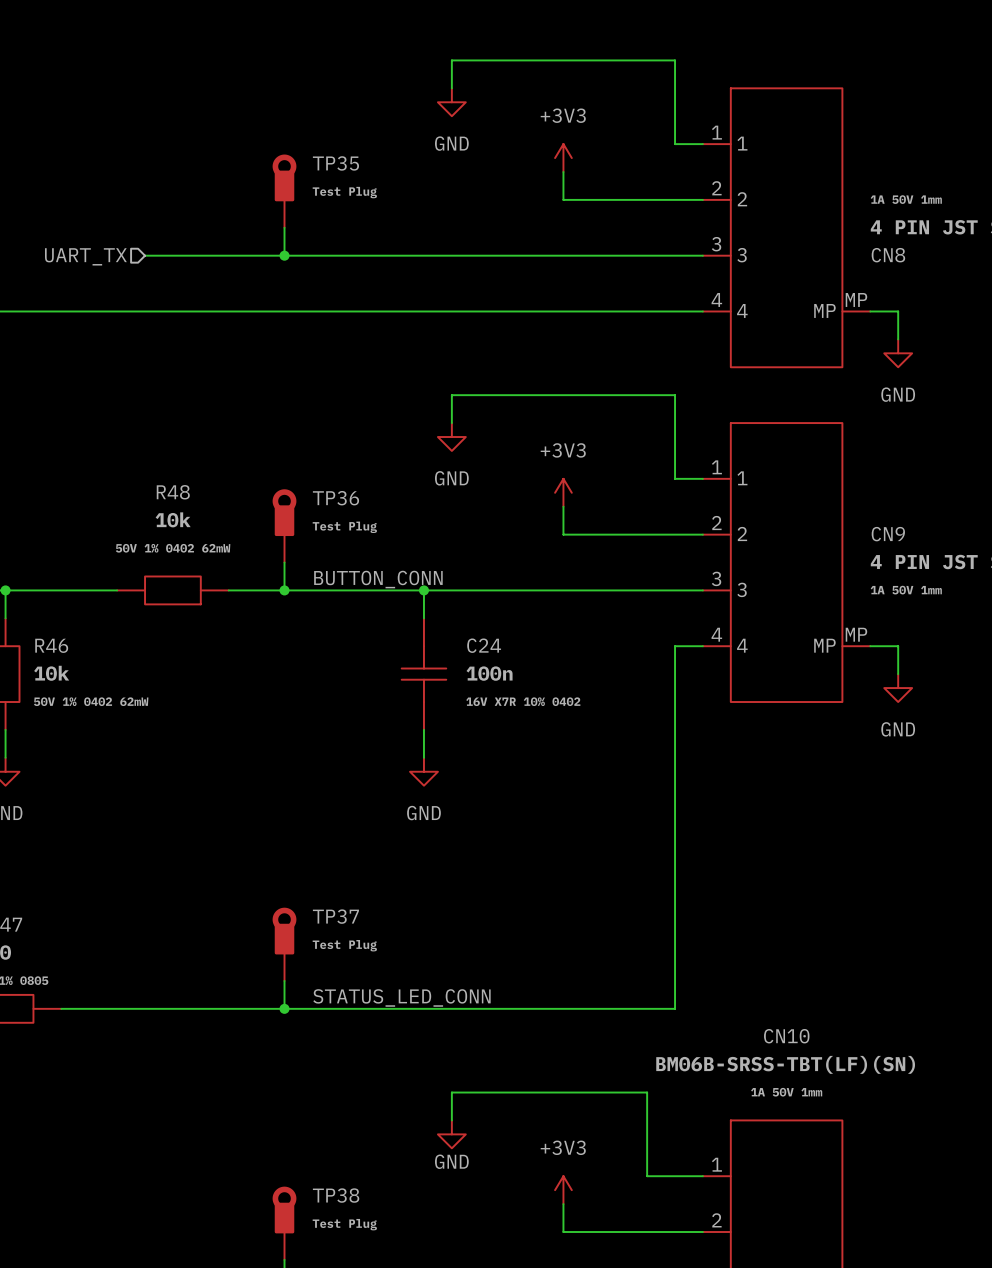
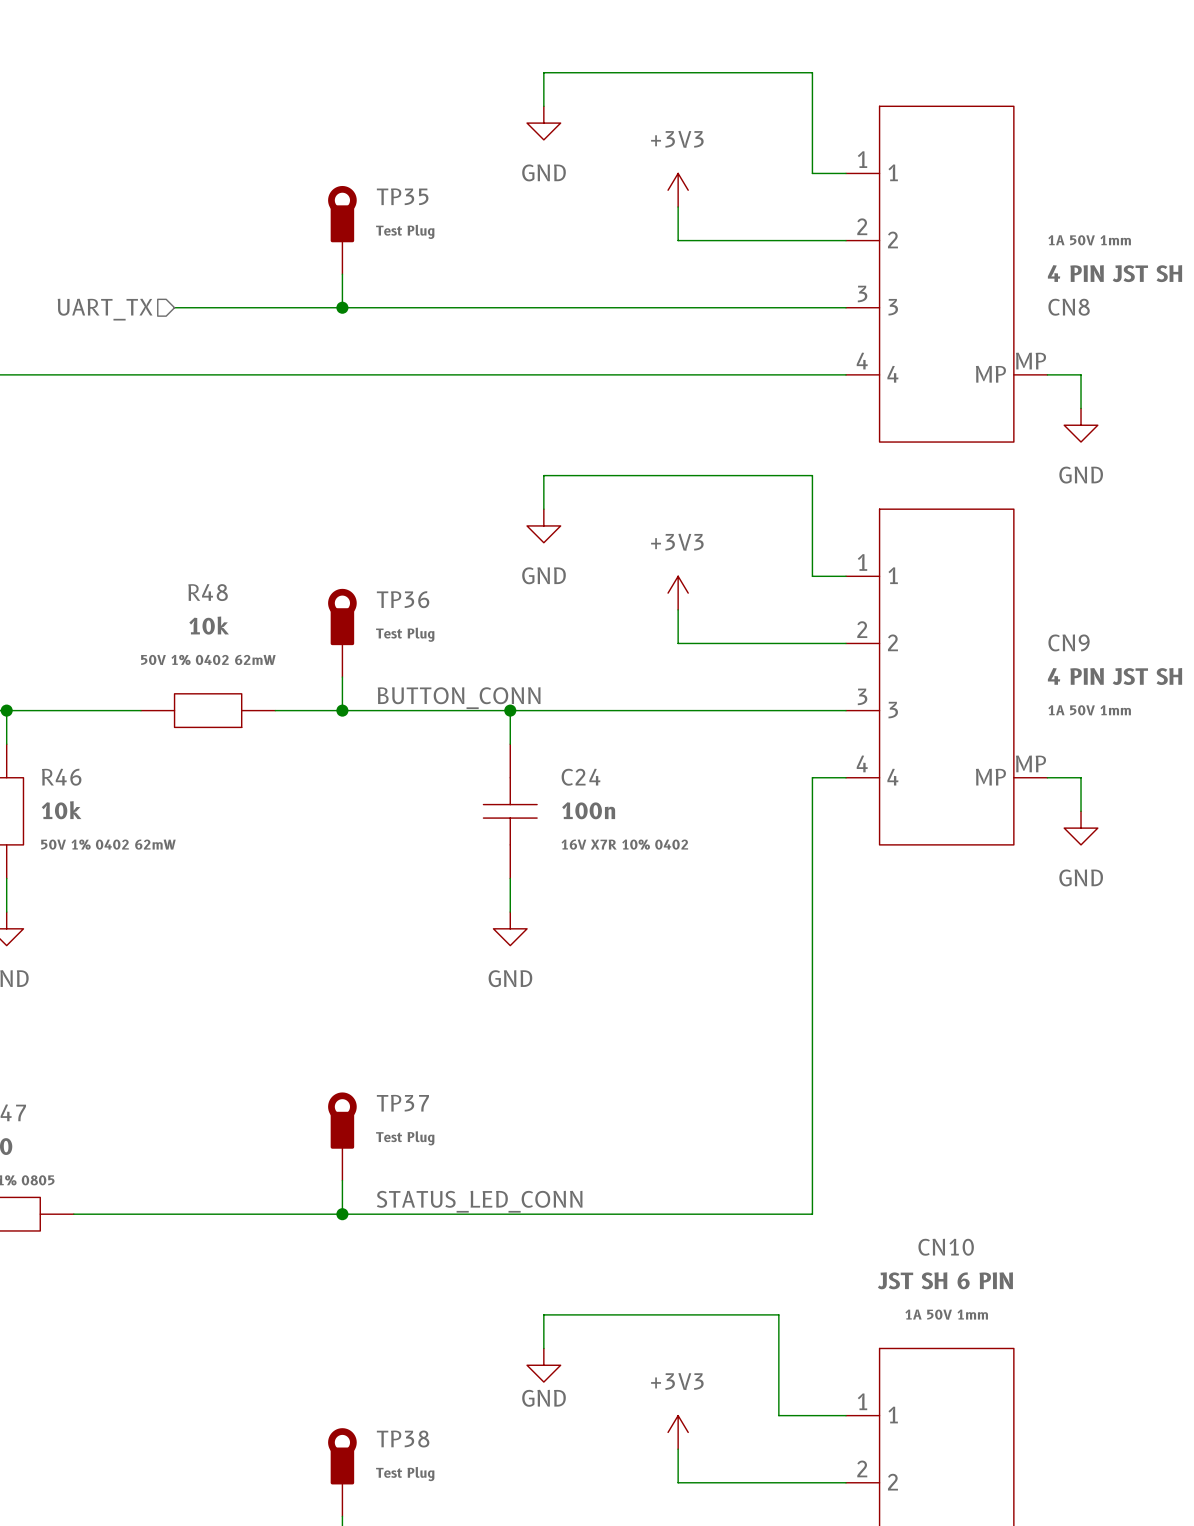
CN10 value: BM06B-SRSS-TBT(LF)(SN) (785, 1064) -> JST SH 6 PIN (945, 1280)
CN10 pin name: none -> 1 (893, 1415)
CN10 pin name: none -> 2 (892, 1482)

